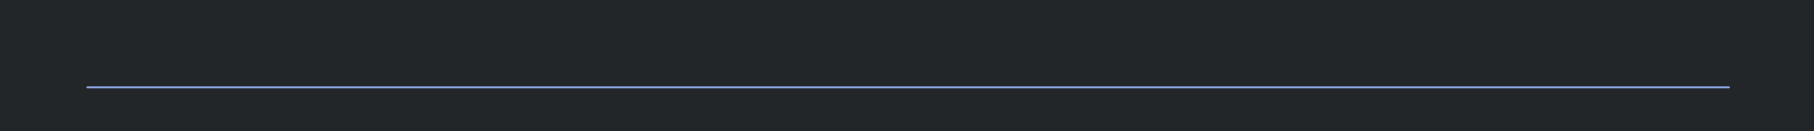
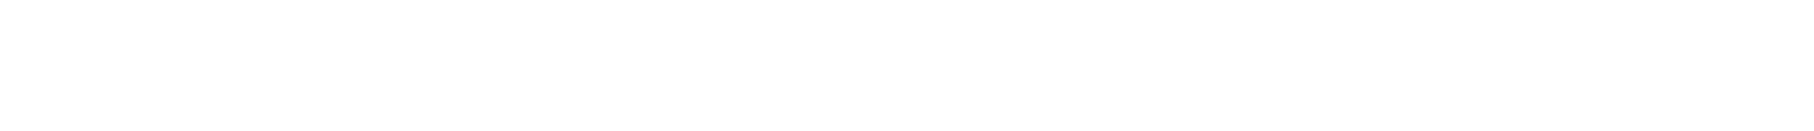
line: (87, 87) (1729, 87) -> none

